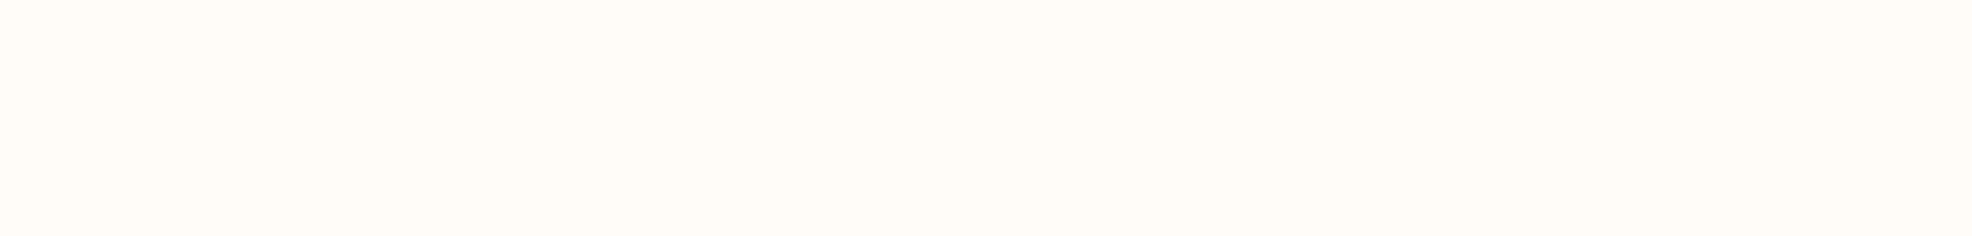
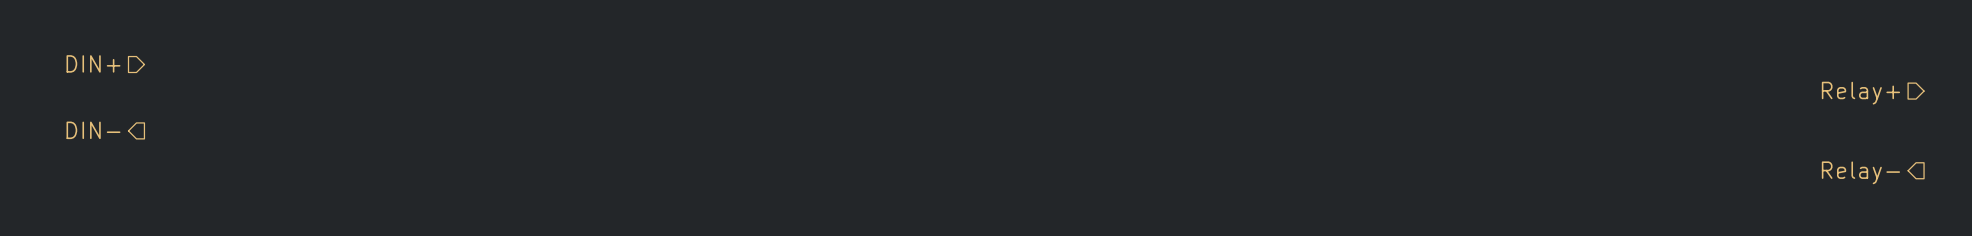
hierarchical label: none -> DIN+ (93, 63)
hierarchical label: none -> Relay+ (1860, 93)
hierarchical label: none -> DIN- (93, 130)
hierarchical label: none -> Relay- (1860, 172)

